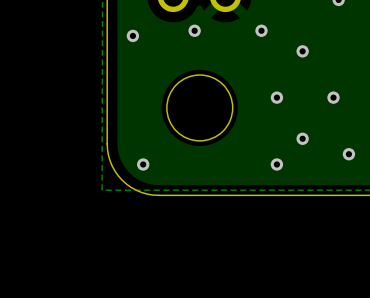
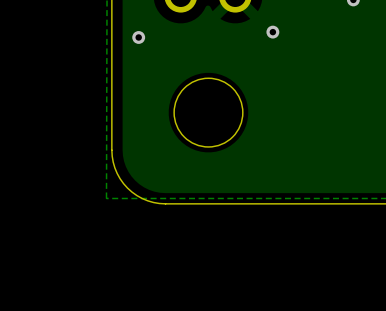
via: (194, 30) -> none
via: (302, 51) -> none
via: (276, 97) -> none
via: (333, 97) -> none
via: (302, 138) -> none
via: (348, 154) -> none
via: (143, 164) -> none
via: (276, 164) -> none

